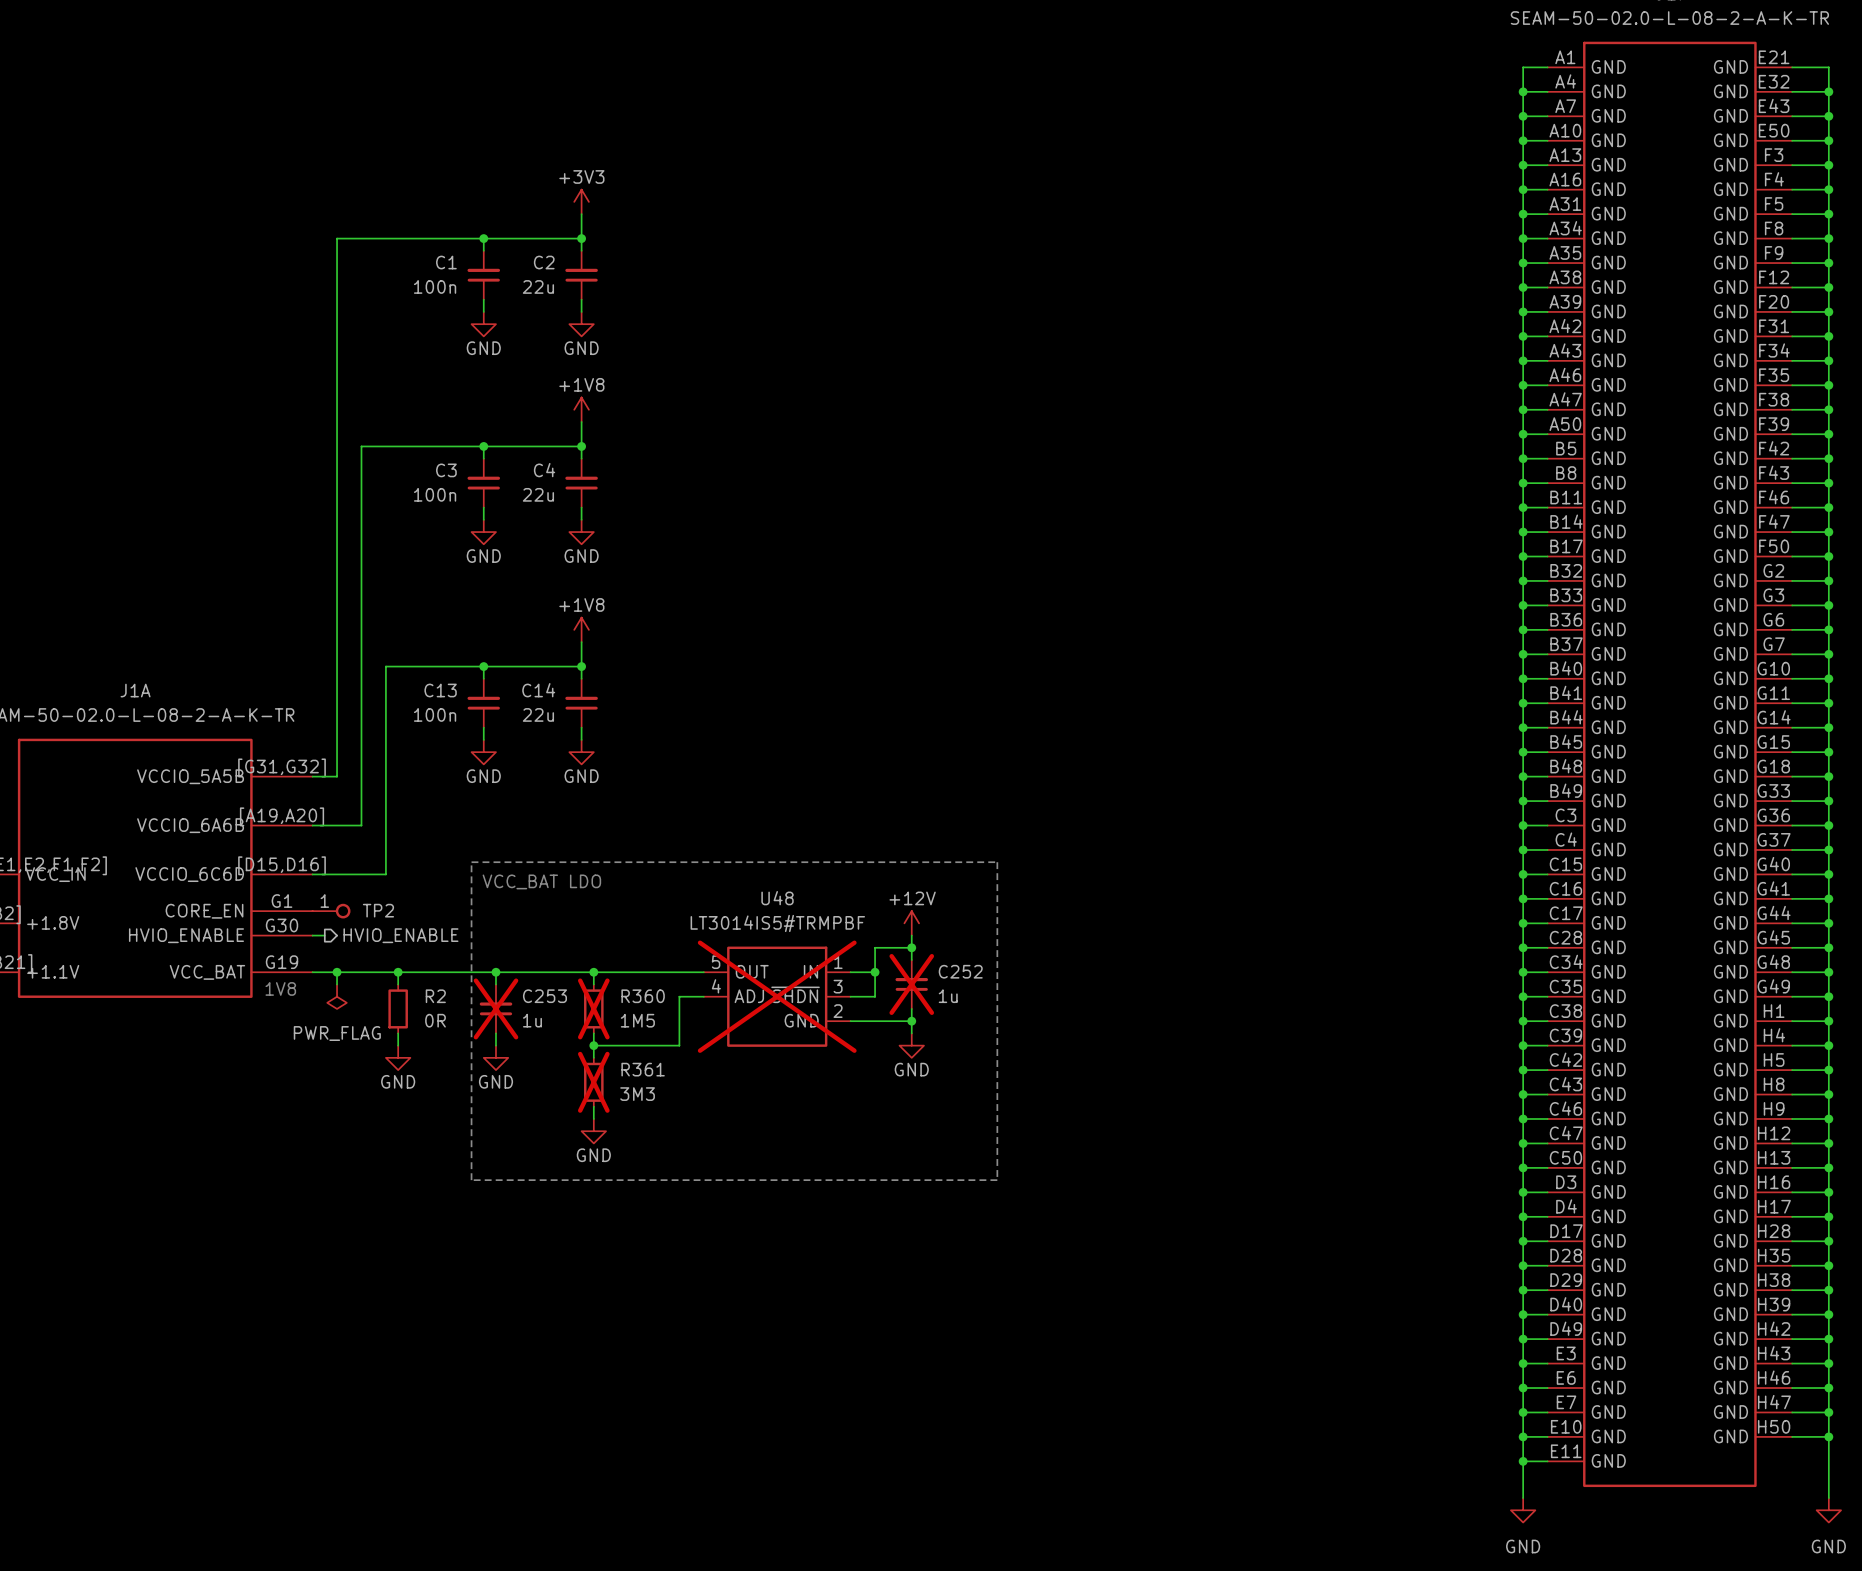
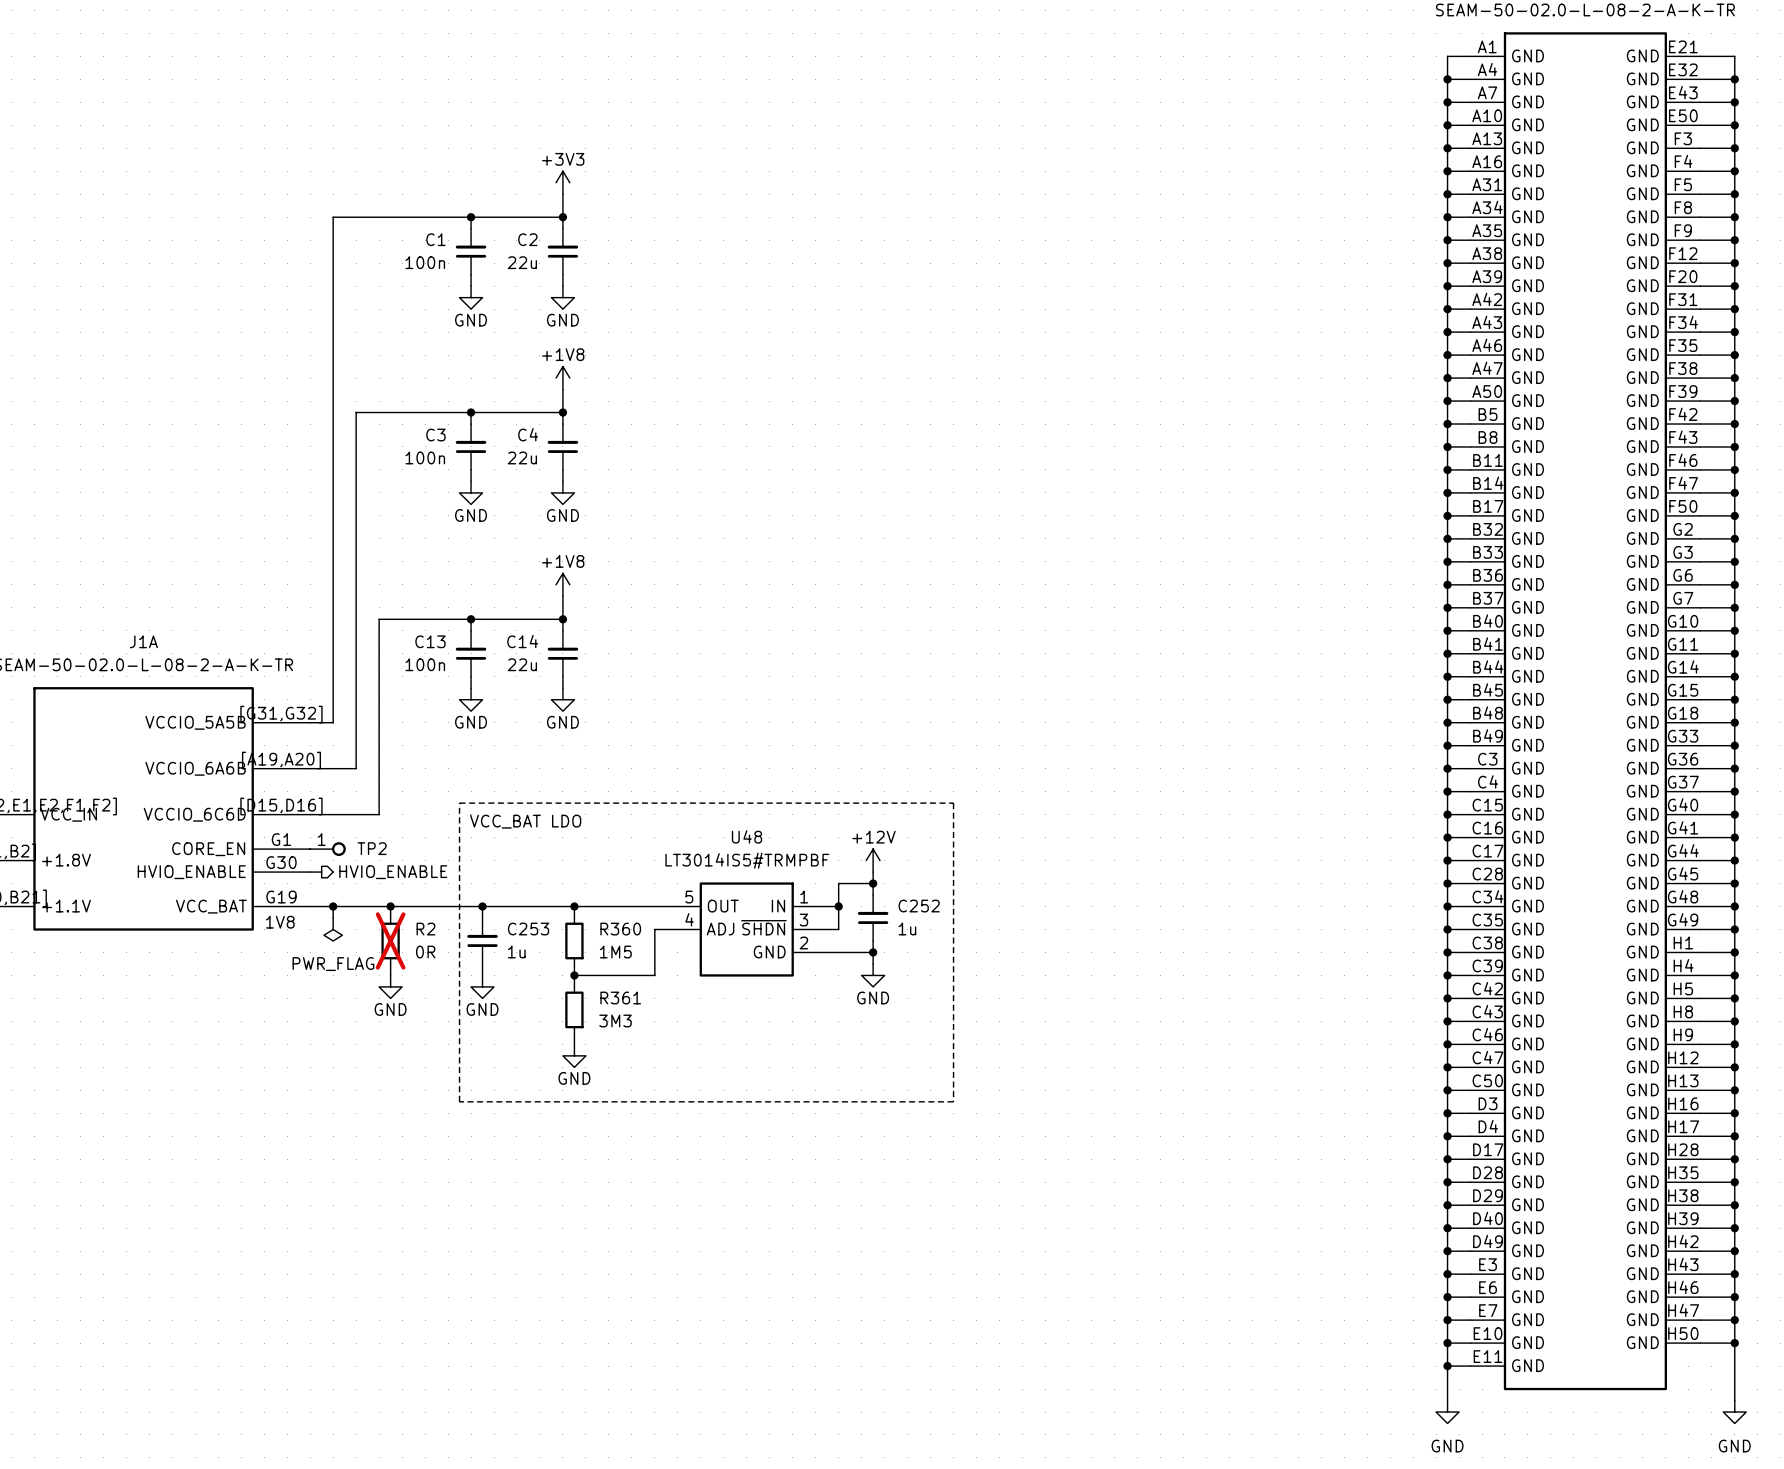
C252 do-not-place cross: (911, 984) -> none
U48 do-not-place cross: (777, 996) -> none
R2 do-not-place cross: none -> (390, 940)
C253 do-not-place cross: (495, 1008) -> none
R360 do-not-place cross: (593, 1008) -> none
R361 do-not-place cross: (593, 1082) -> none

